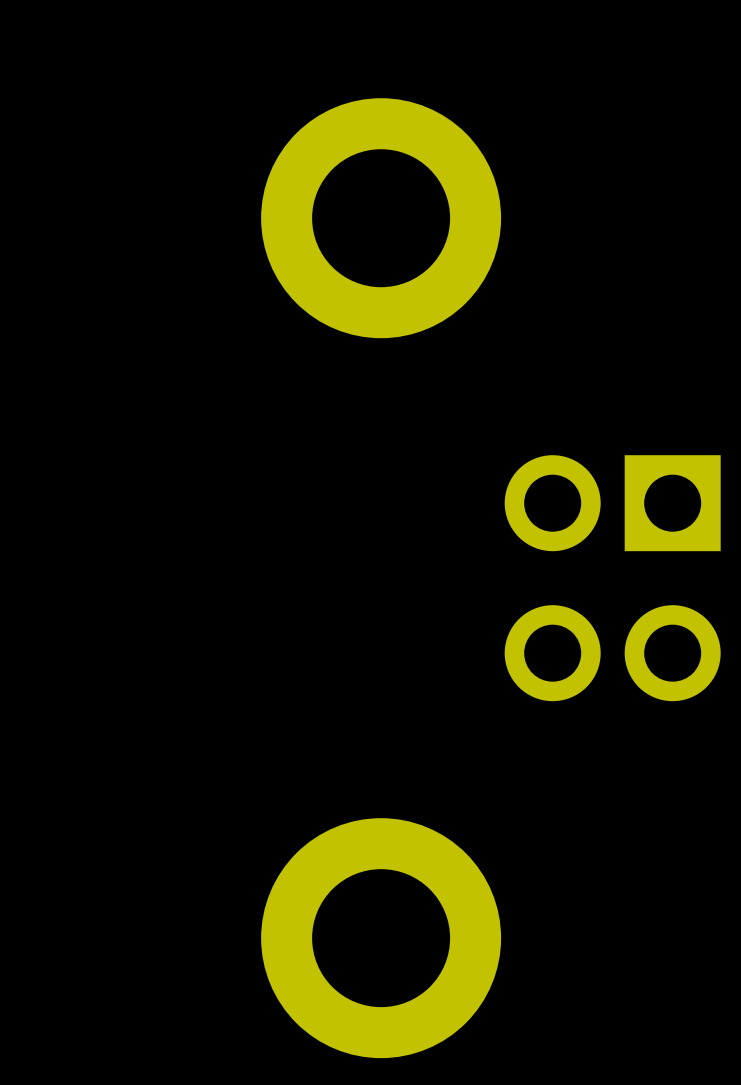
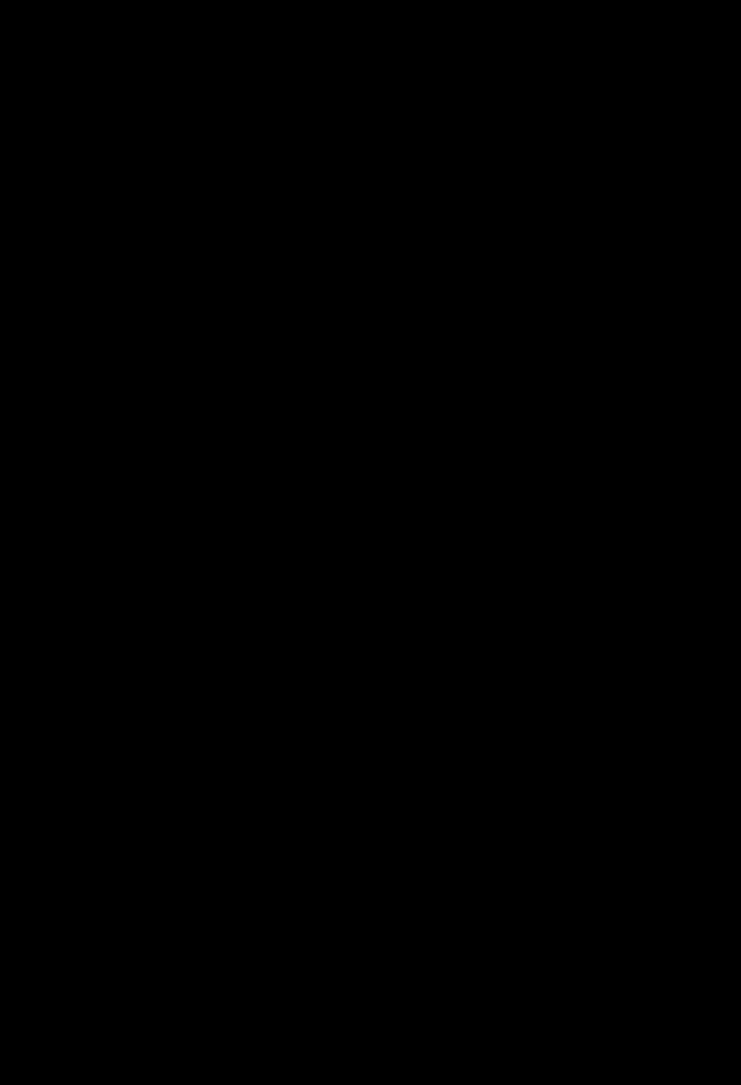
part: (490, 578) -> none

